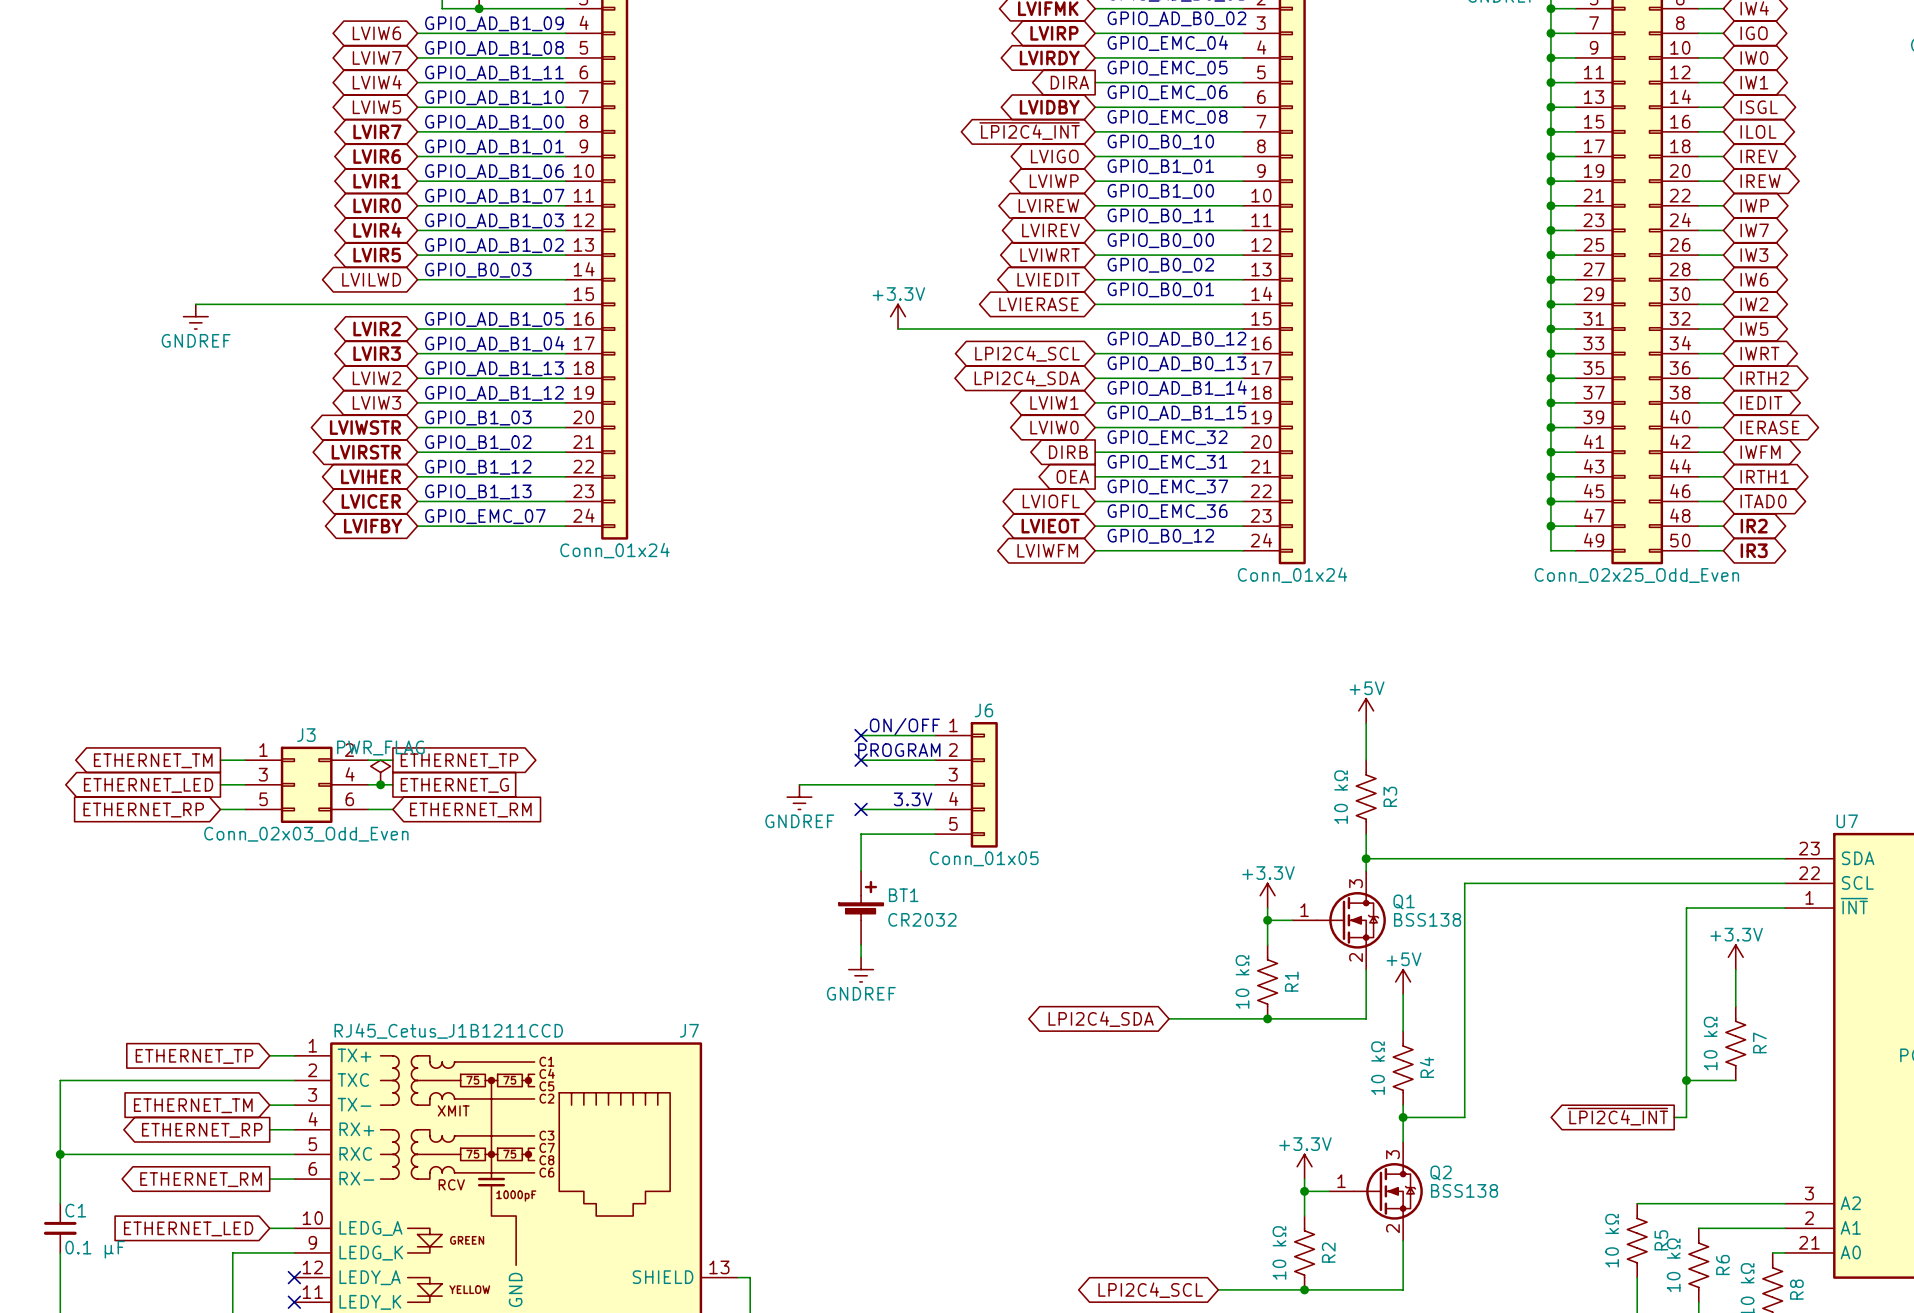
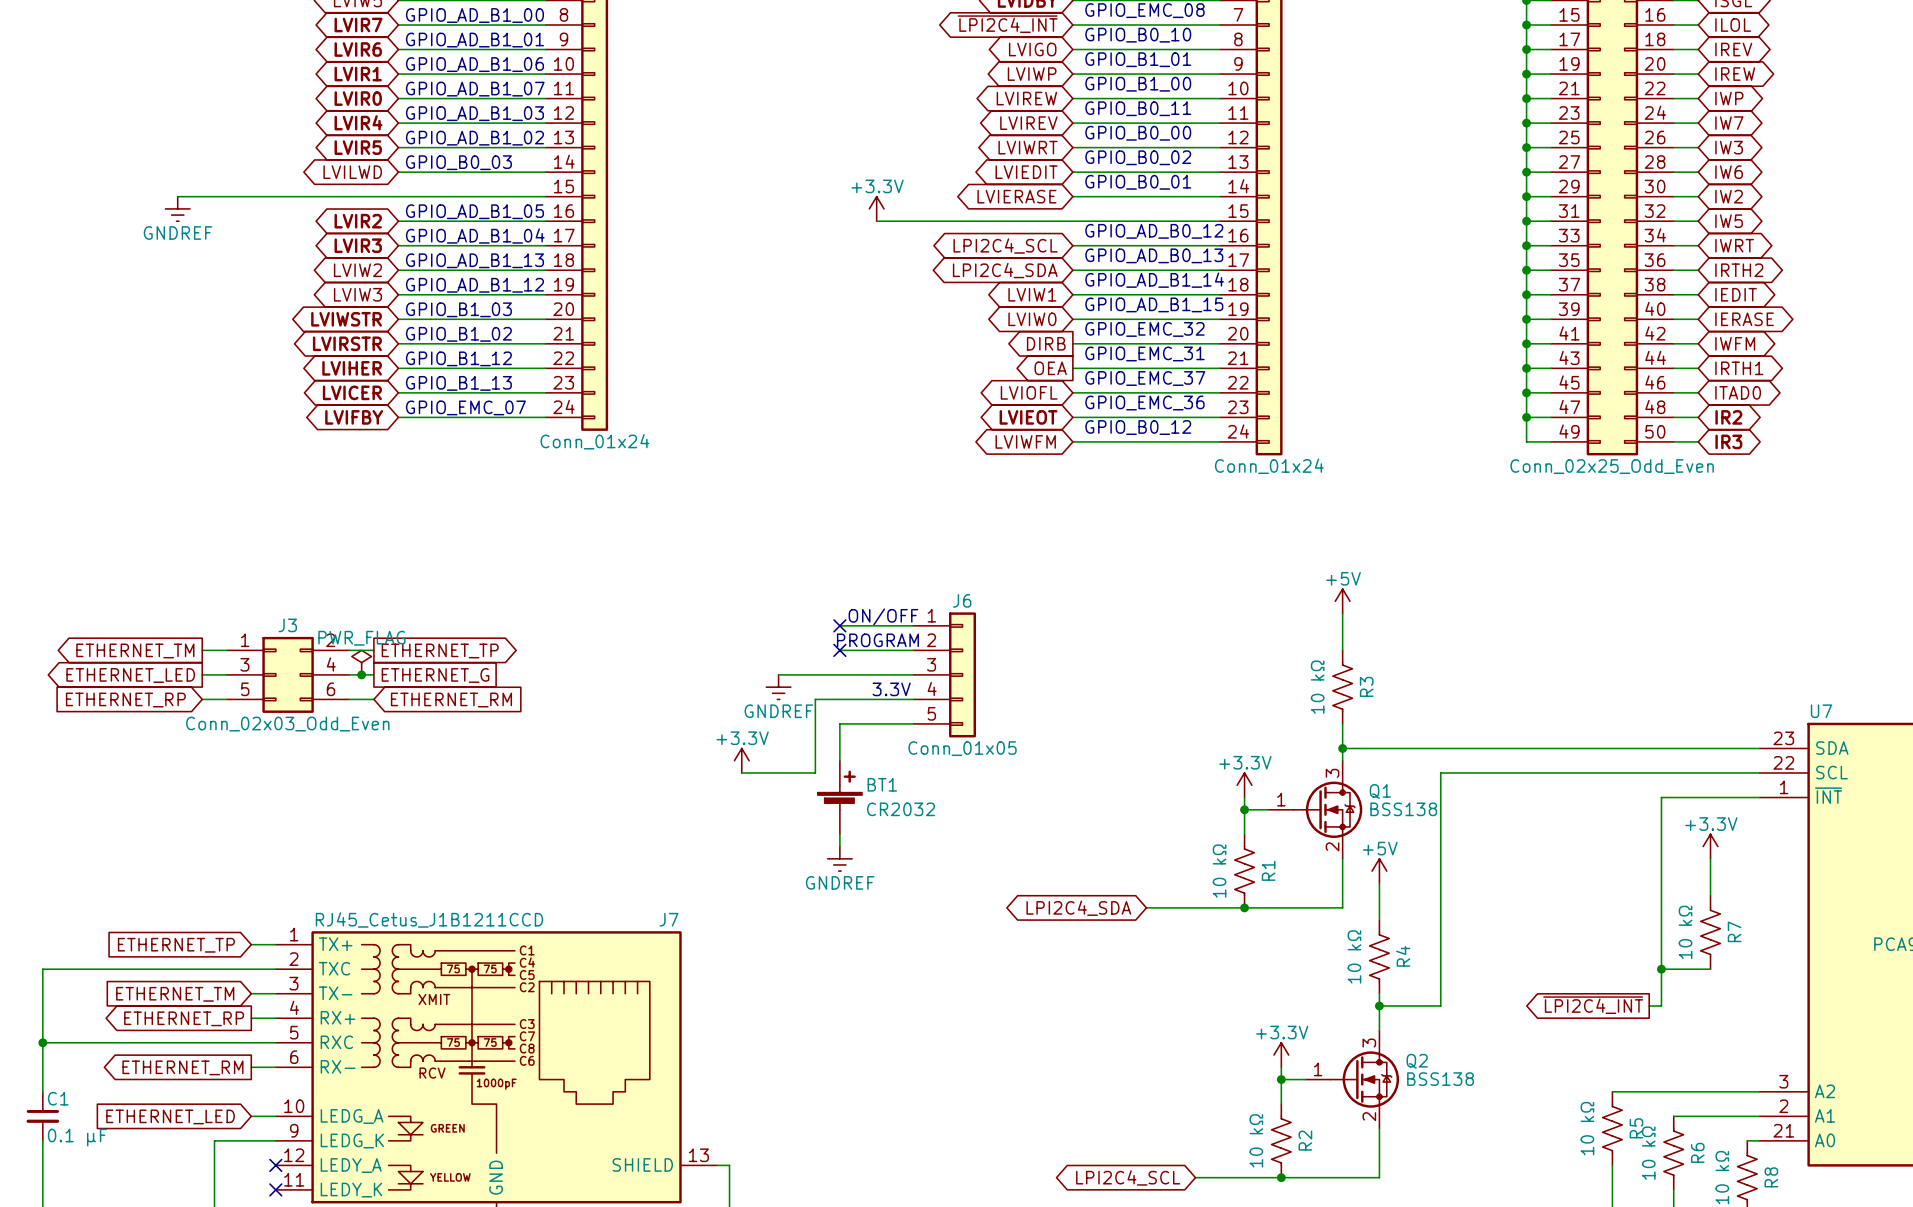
wire: none -> (839, 699) (815, 699) (815, 773) (741, 773)
no-connect mark: (861, 809) -> none
power symbol: none -> +3.3V (741, 760)

